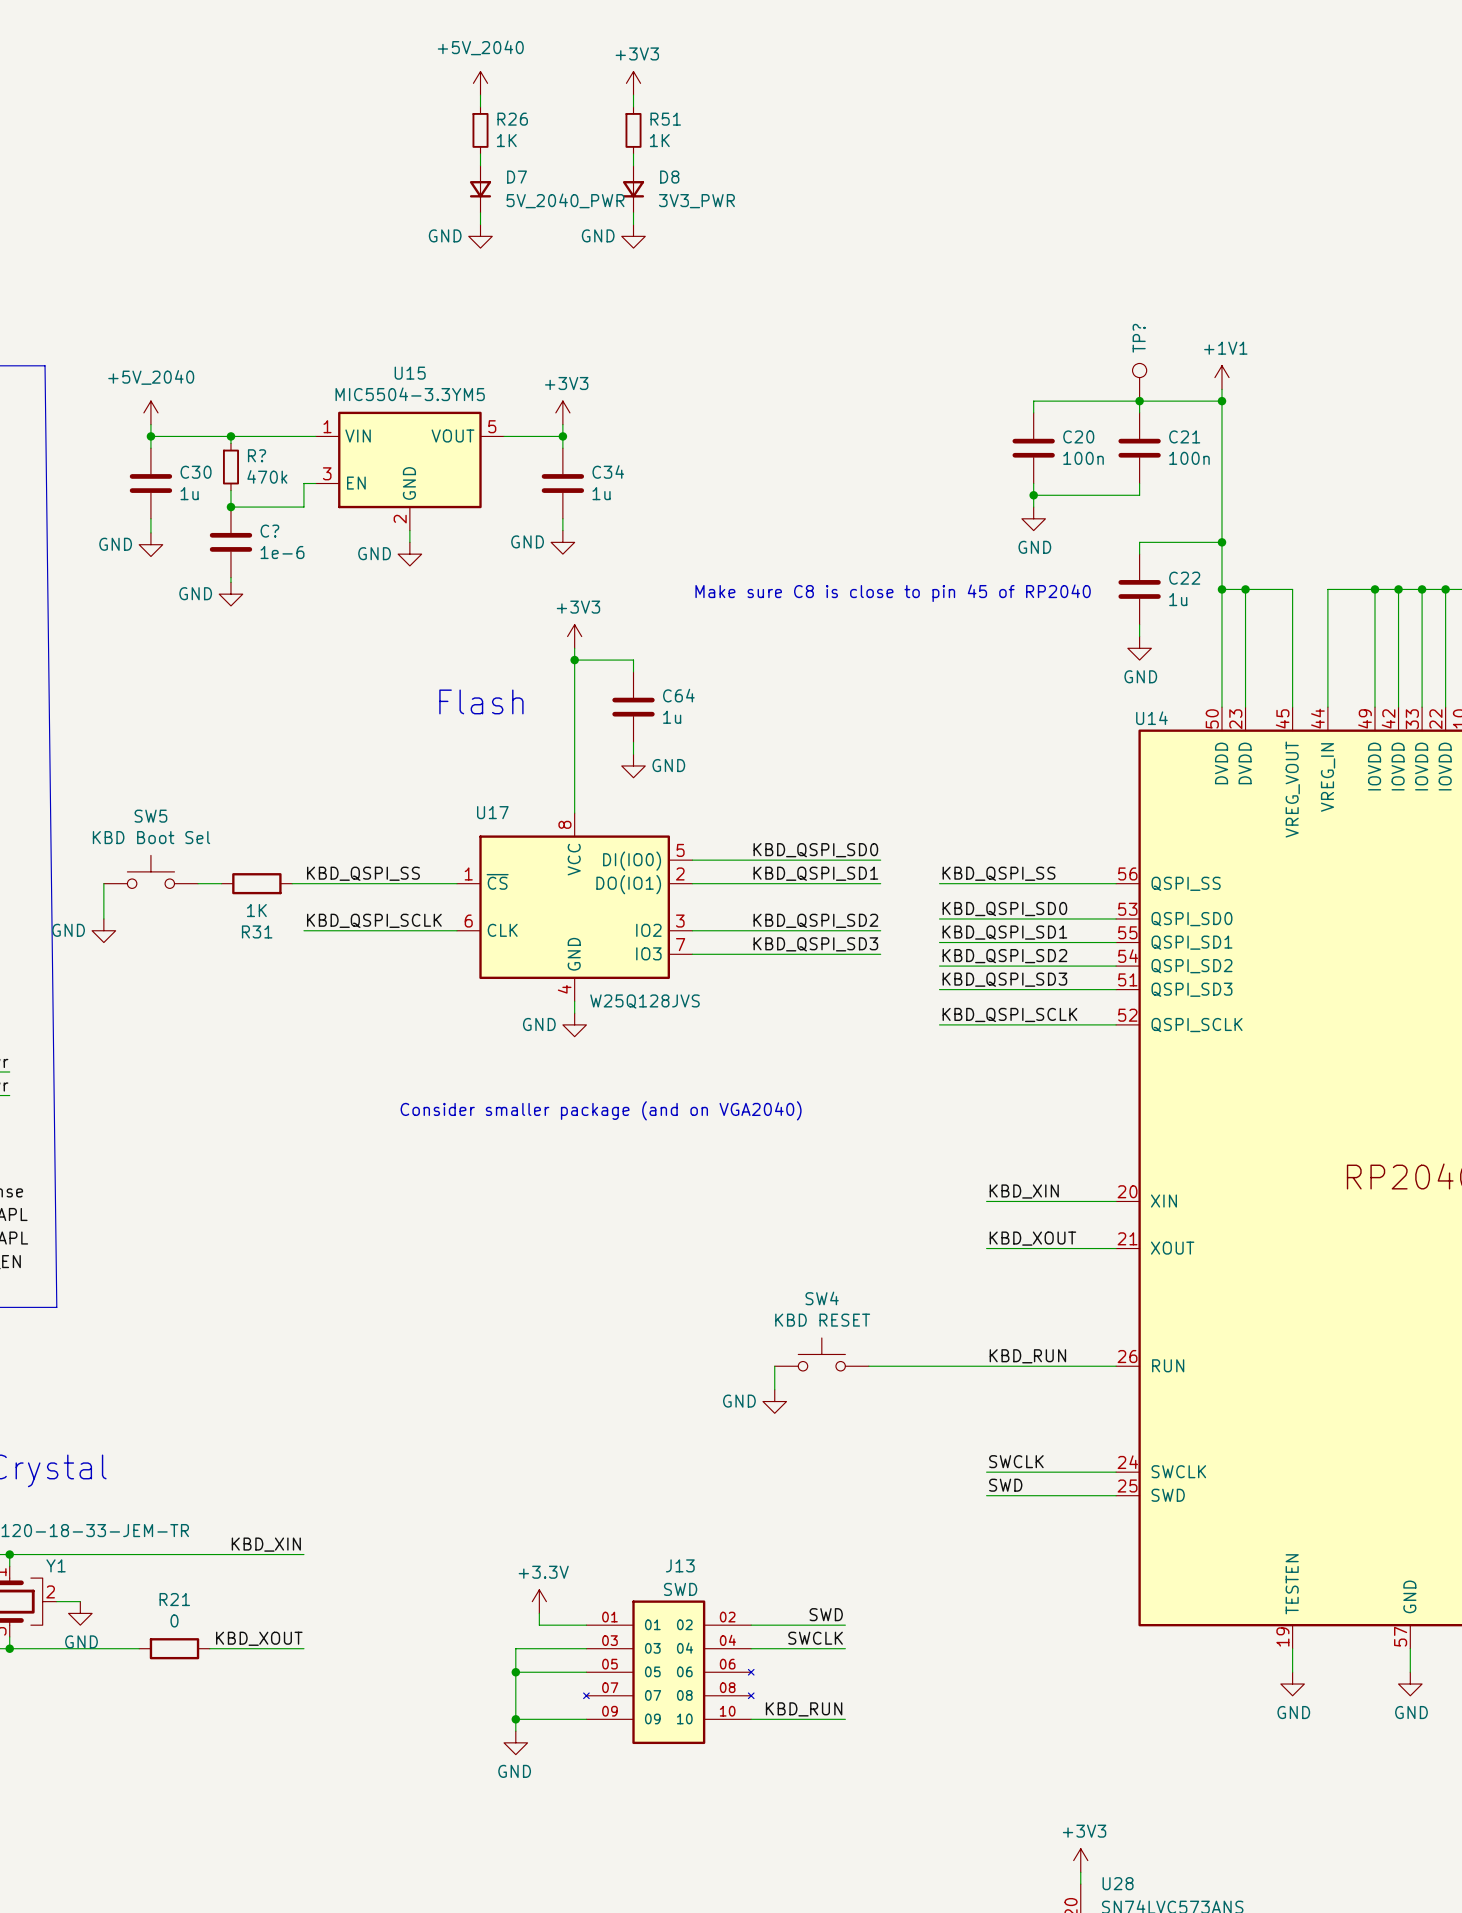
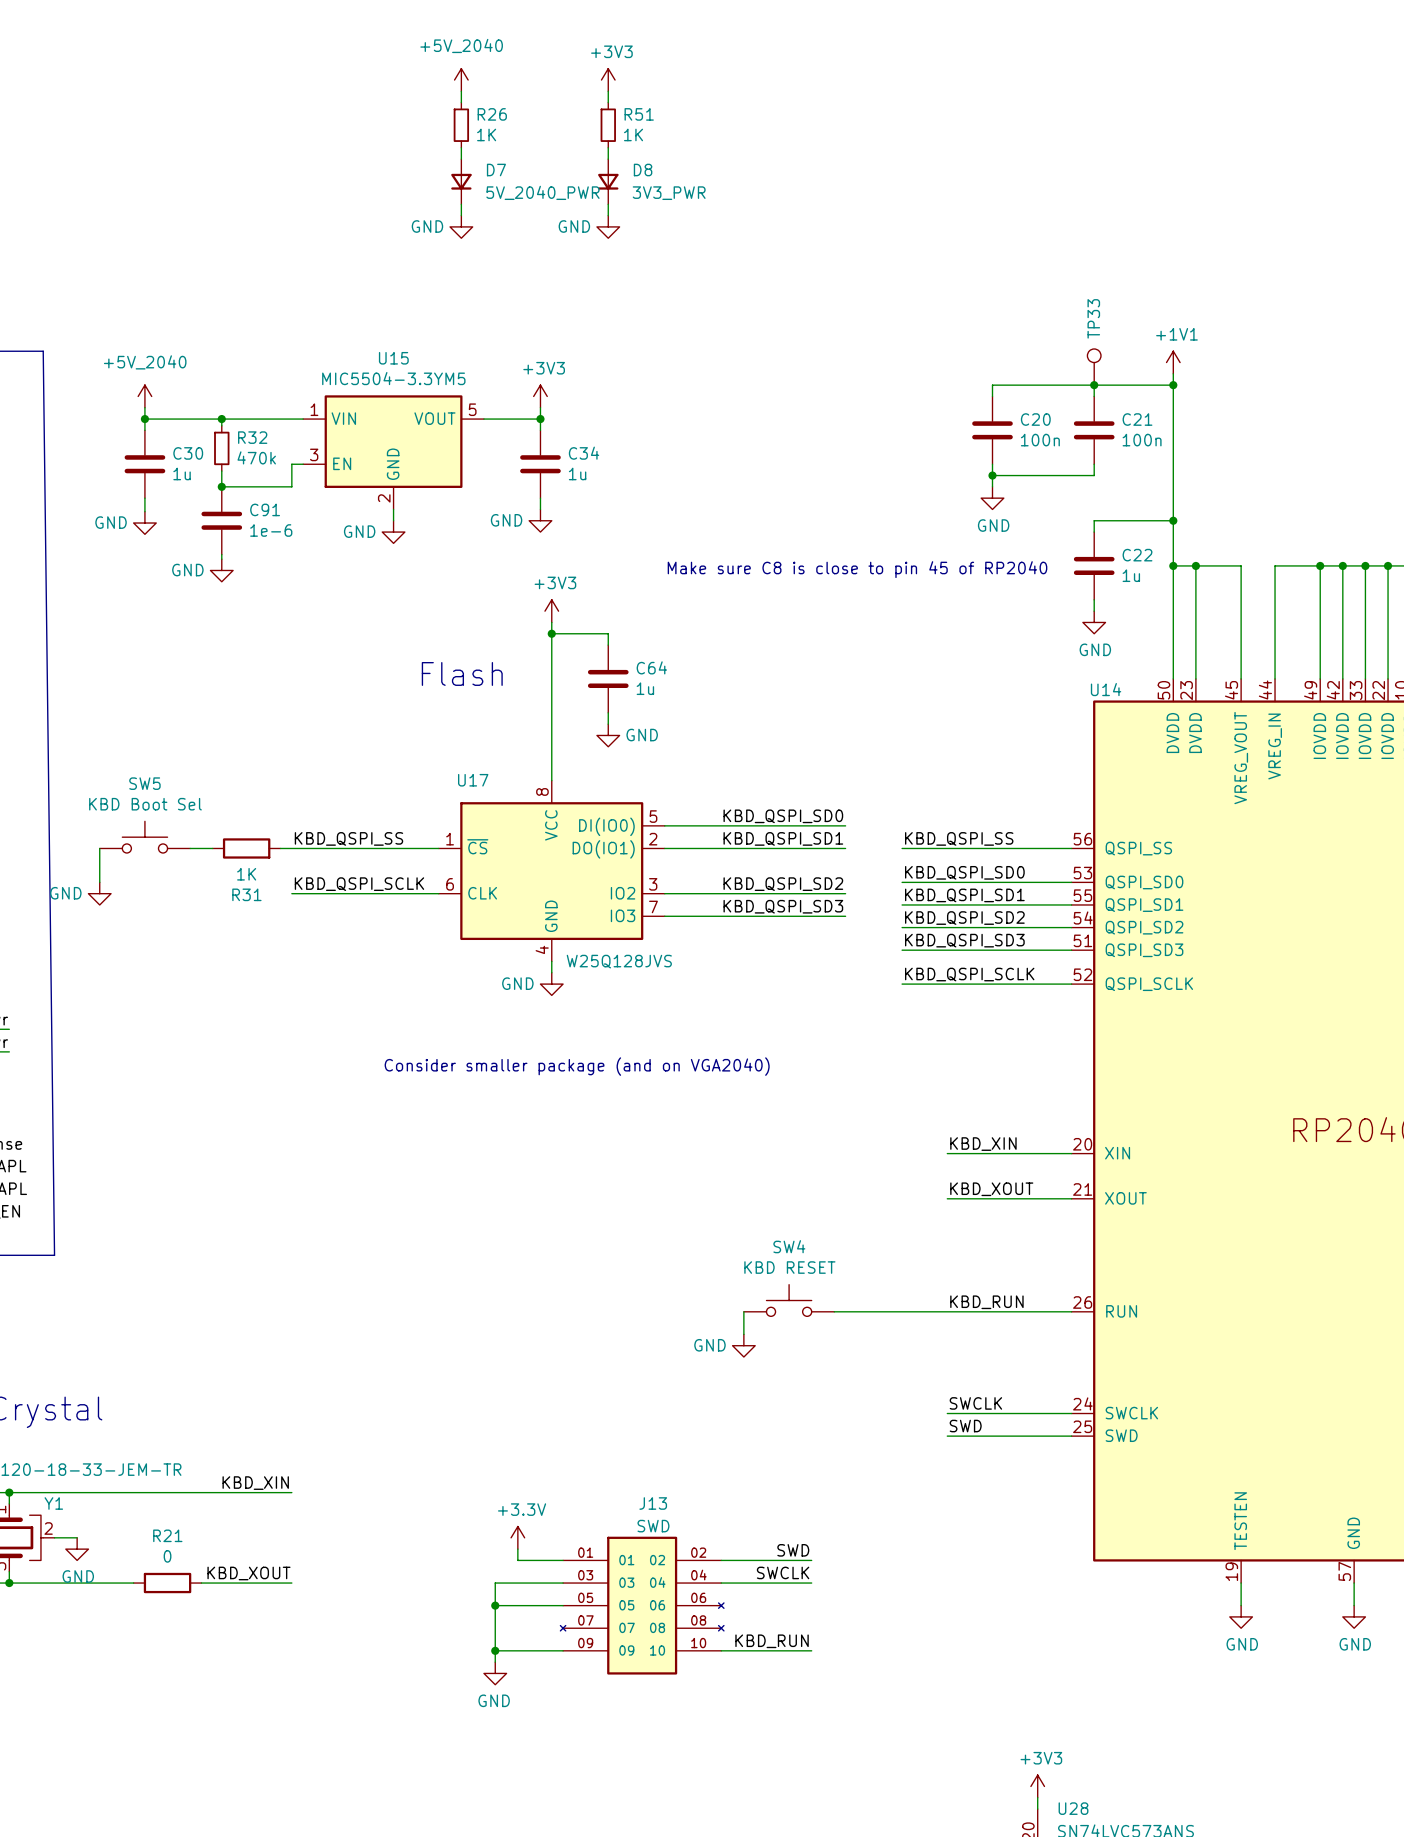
TP? name: TP? (1139, 338) -> TP33 (1093, 318)
R? name: R? (257, 455) -> R32 (252, 437)
C? name: C? (269, 531) -> C91 (265, 509)

